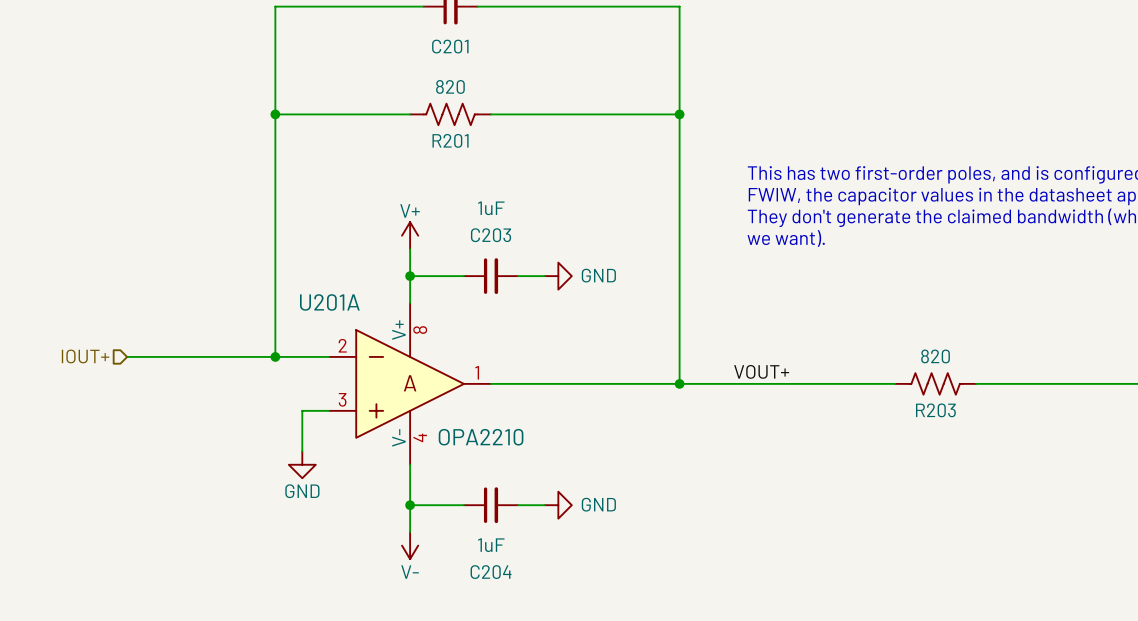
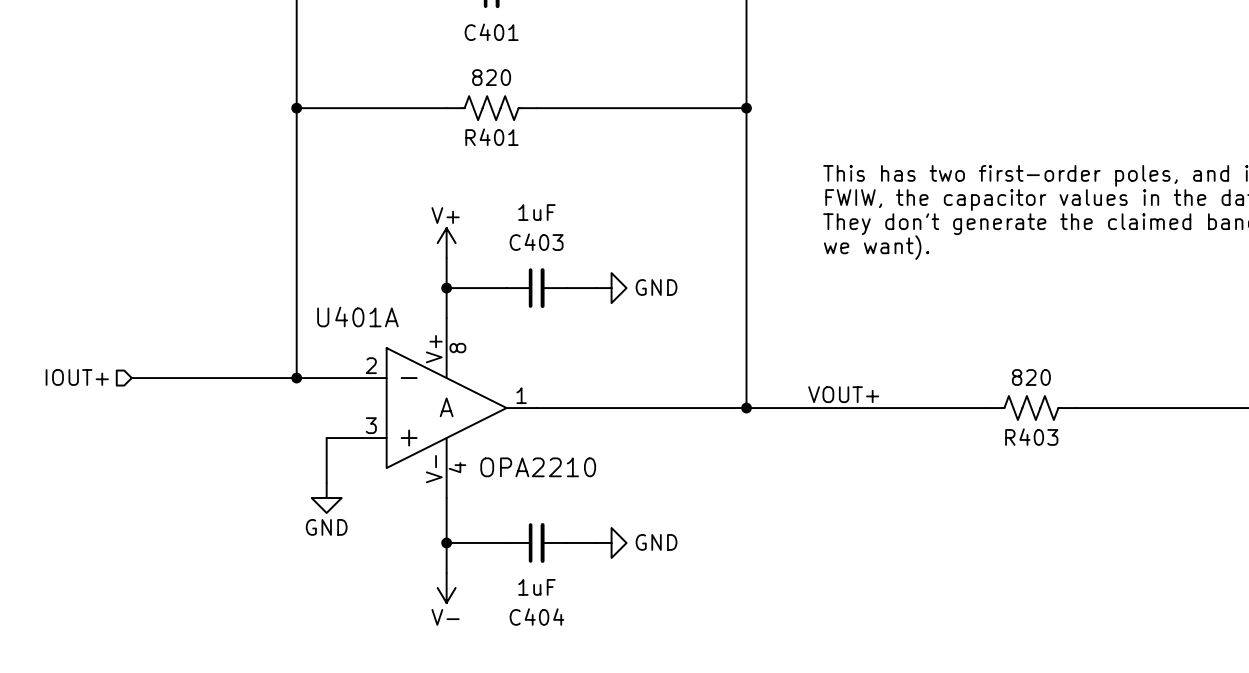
C201 name: C201 (450, 46) -> C401 (491, 32)
R201 name: R201 (450, 140) -> R401 (491, 137)
C203 name: C203 (491, 235) -> C403 (536, 242)
U201A name: U201A (329, 302) -> U401A (357, 316)
R203 name: R203 (935, 410) -> R403 (1031, 437)
C204 name: C204 (491, 572) -> C404 (536, 617)

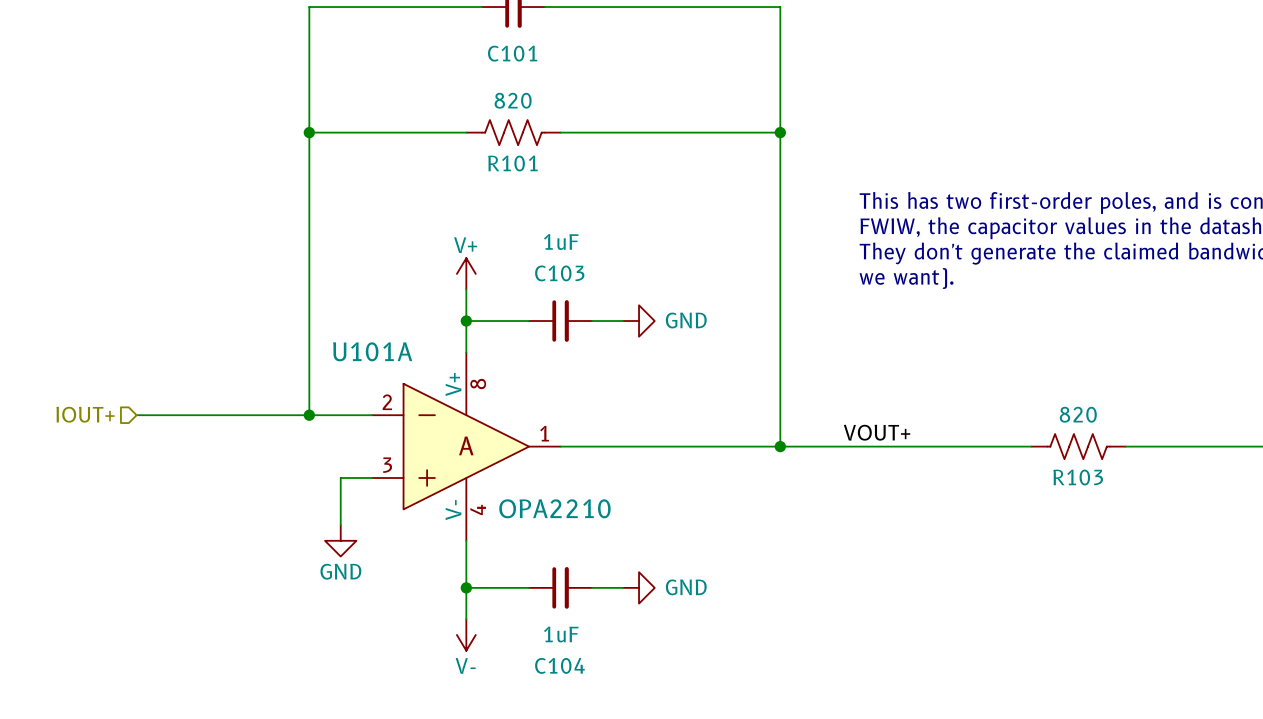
C401 name: C401 (491, 32) -> C101 (512, 53)
R401 name: R401 (491, 137) -> R101 (512, 163)
C403 name: C403 (536, 242) -> C103 (559, 273)
U401A name: U401A (357, 316) -> U101A (372, 351)
R403 name: R403 (1031, 437) -> R103 (1078, 477)
C404 name: C404 (536, 617) -> C104 (559, 665)

